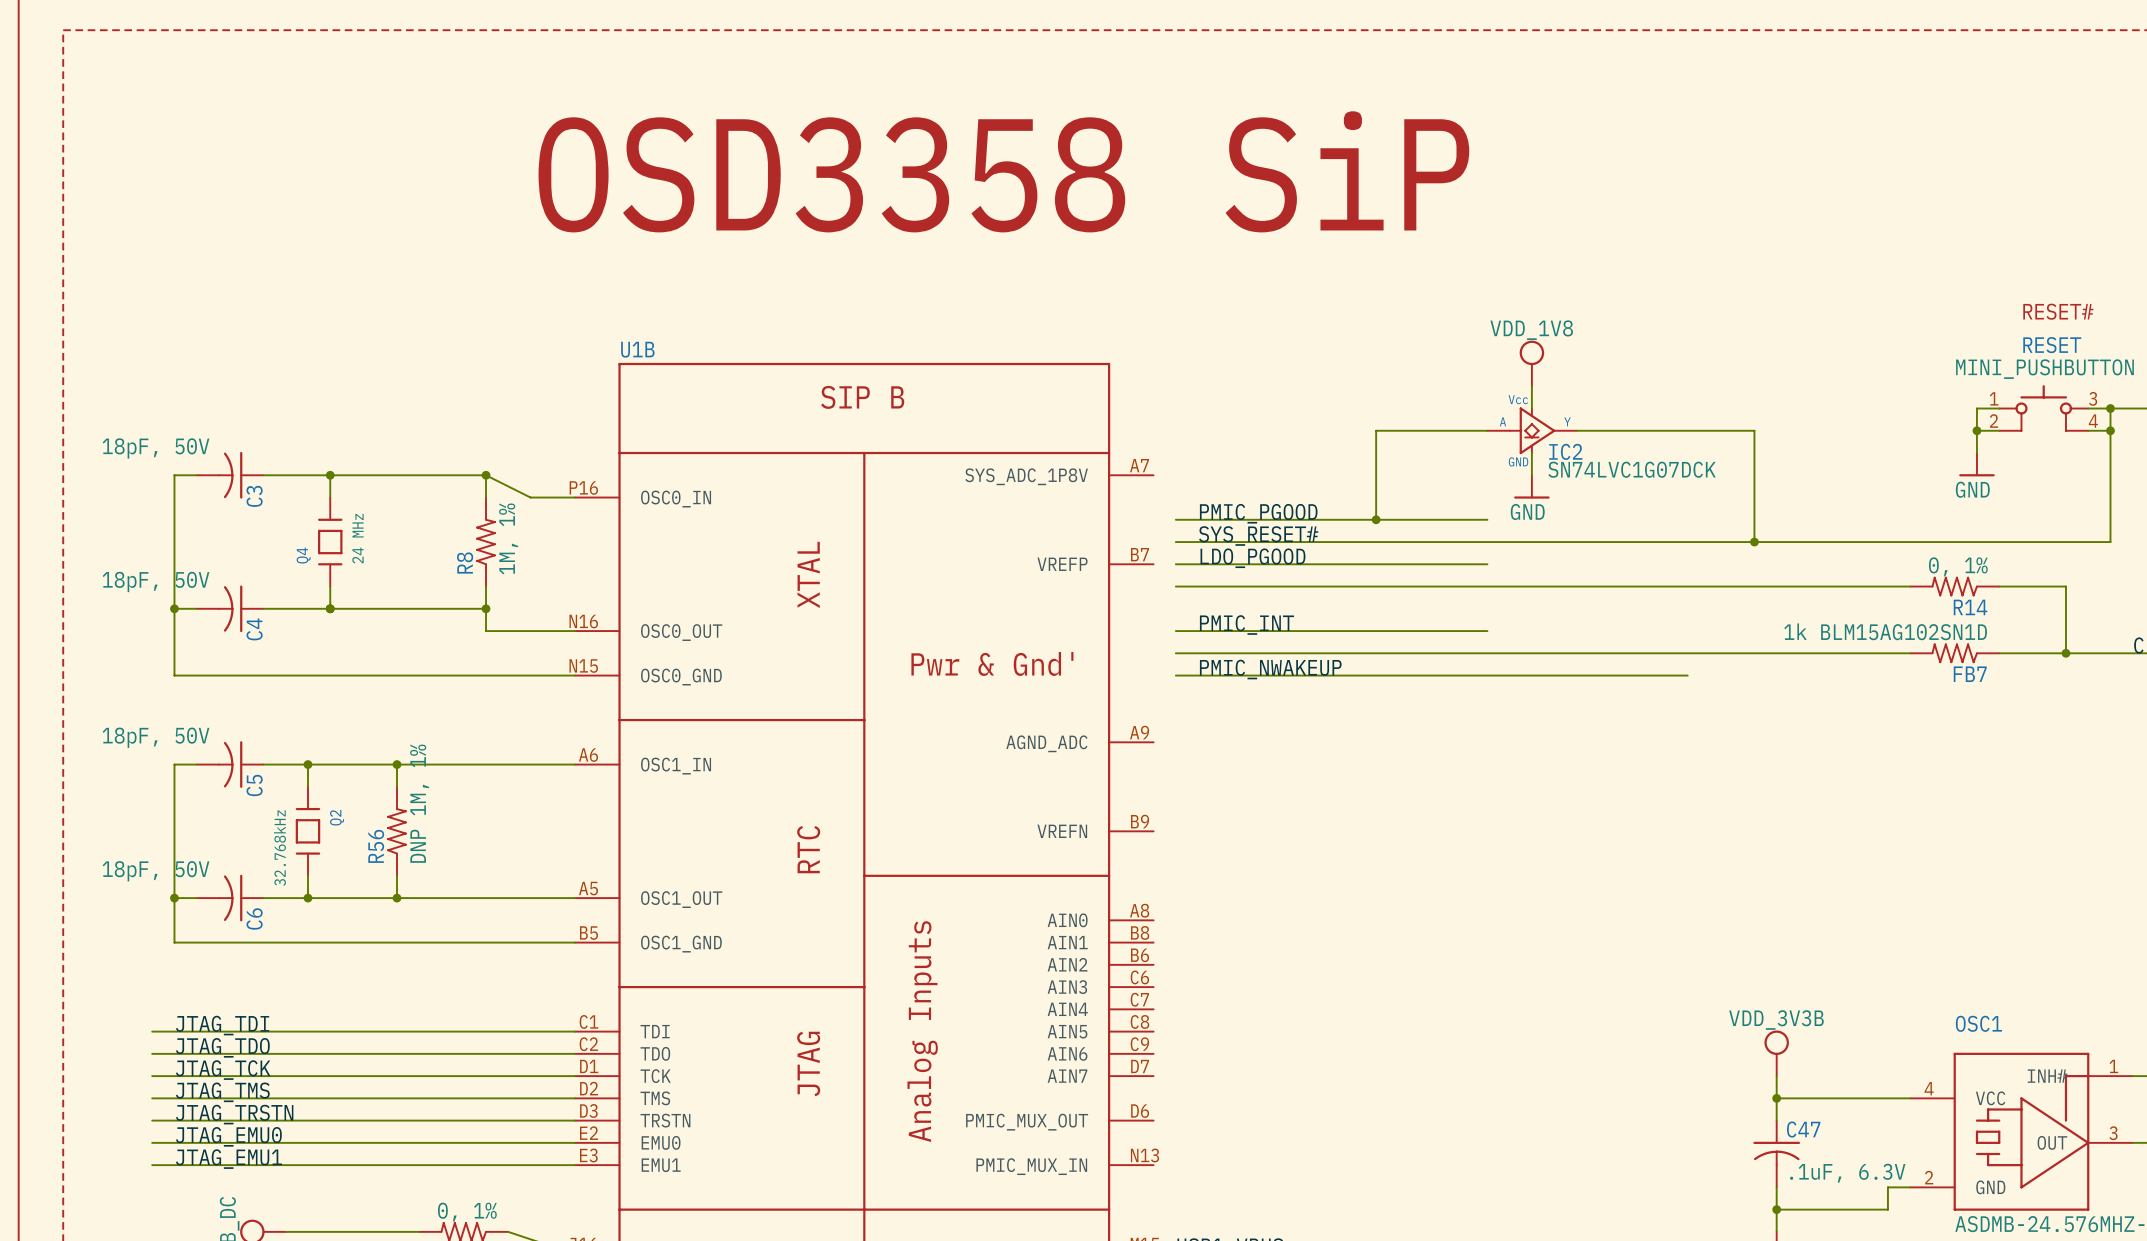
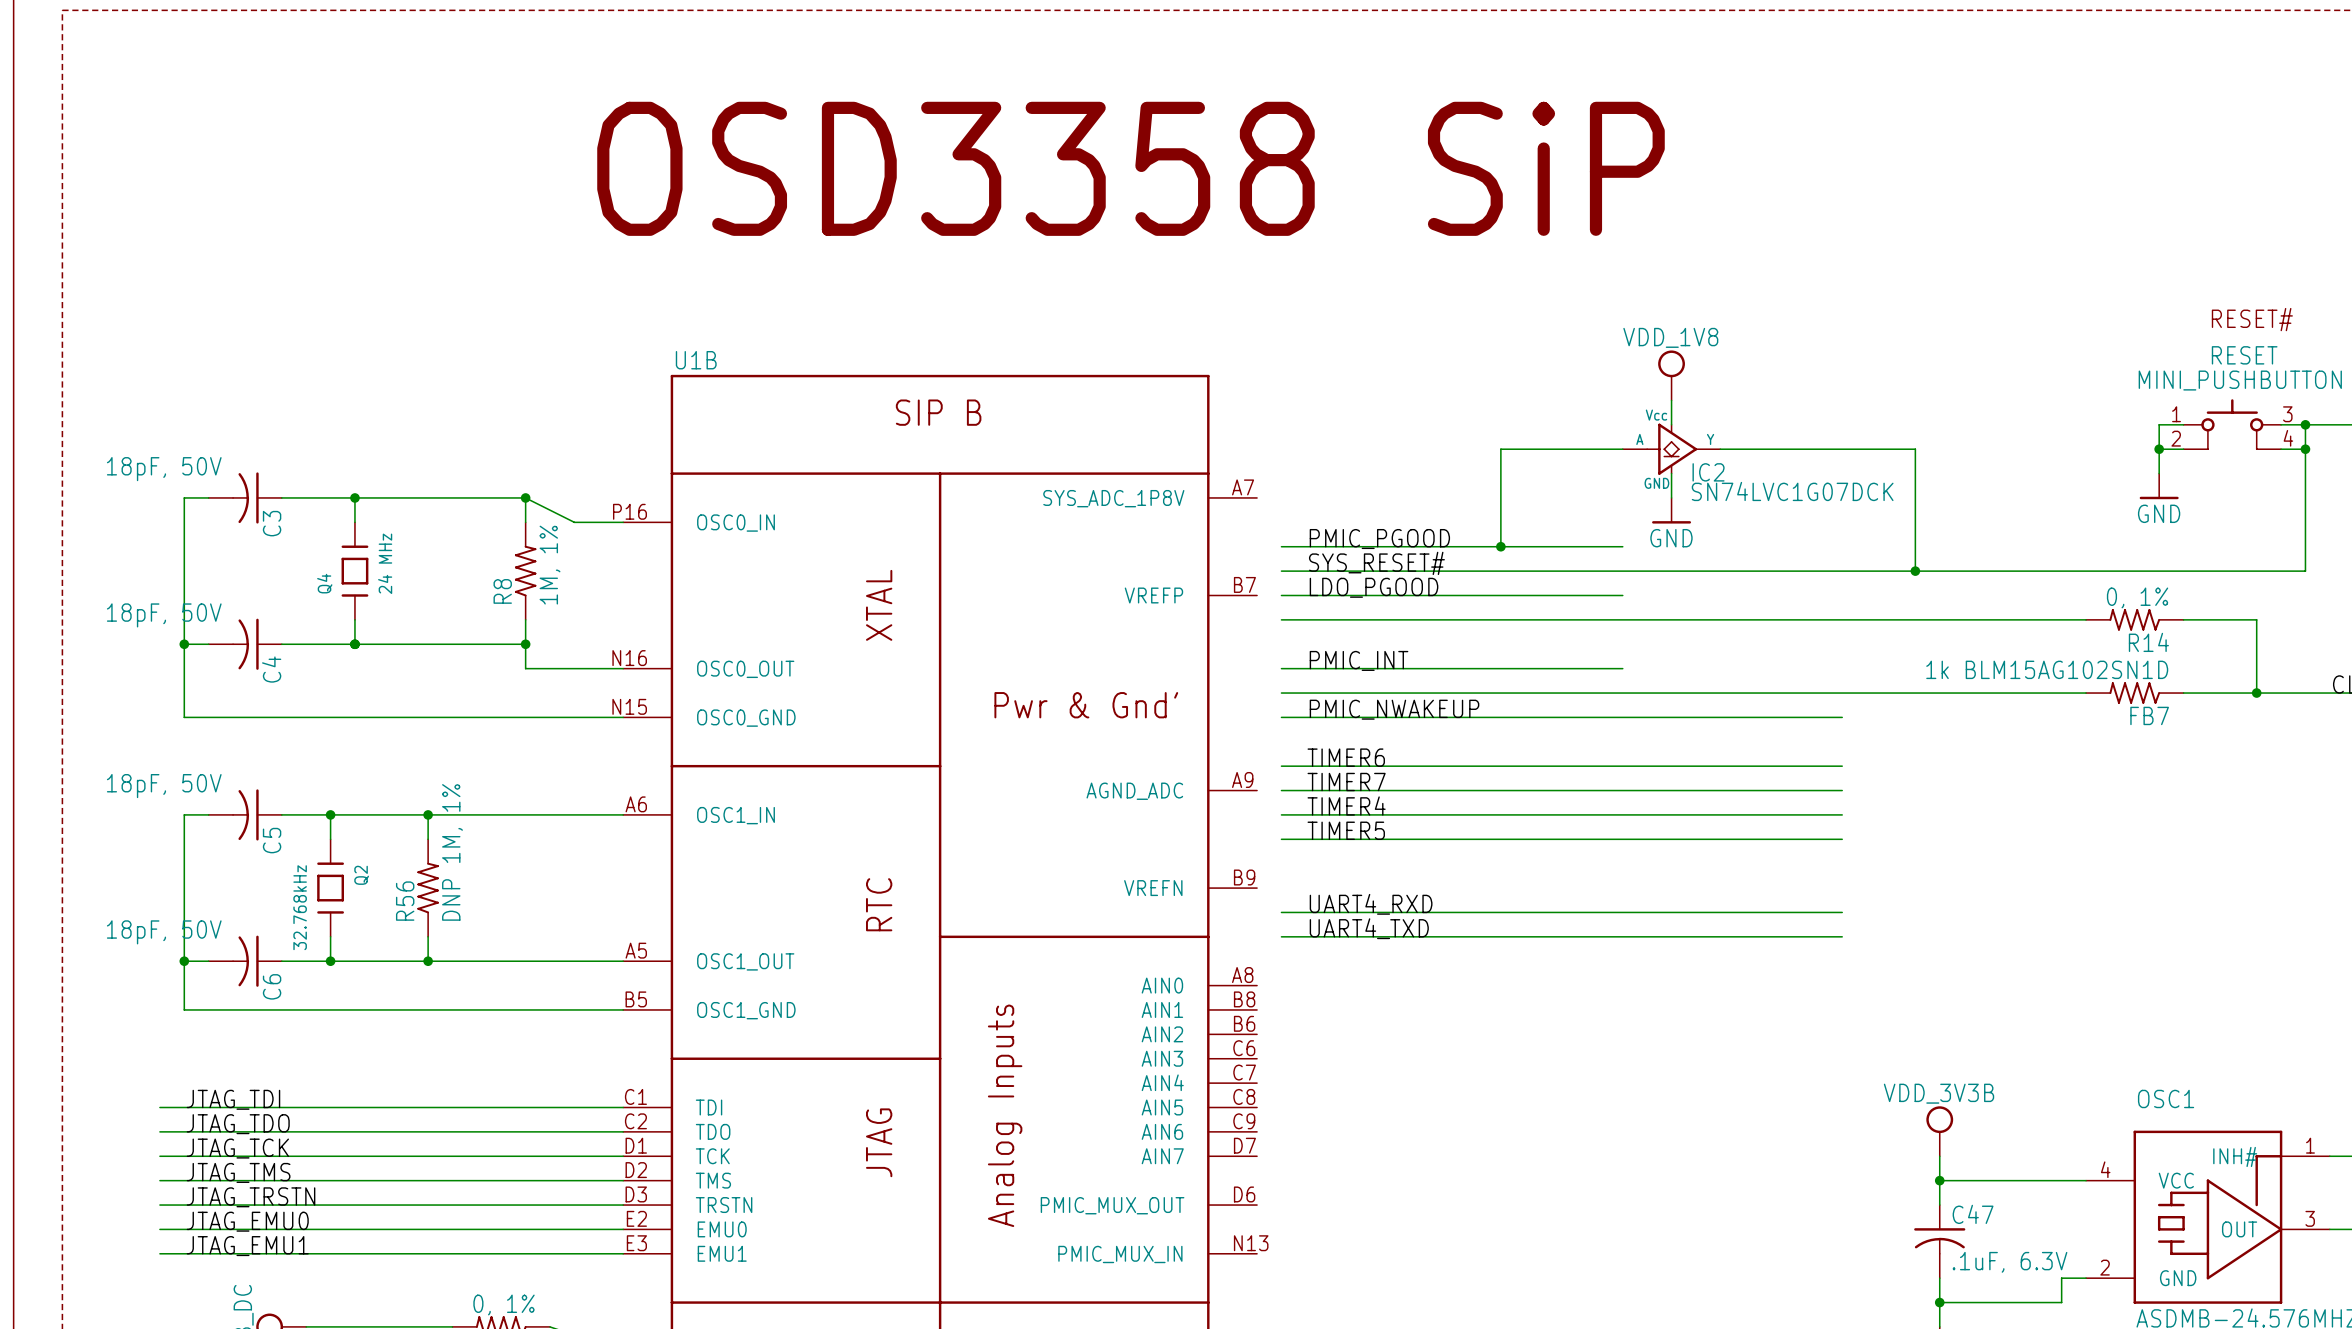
label: none -> TIMER6 (1346, 757)
wire: none -> (1281, 766) (1842, 766)
label: none -> TIMER7 (1346, 782)
wire: none -> (1281, 790) (1842, 790)
label: none -> TIMER4 (1346, 805)
wire: none -> (1281, 814) (1842, 814)
label: none -> TIMER5 (1346, 830)
wire: none -> (1281, 839) (1842, 839)
label: none -> UART4_RXD (1371, 904)
wire: none -> (1281, 912) (1842, 912)
label: none -> UART4_TXD (1369, 928)
wire: none -> (1281, 936) (1842, 936)

